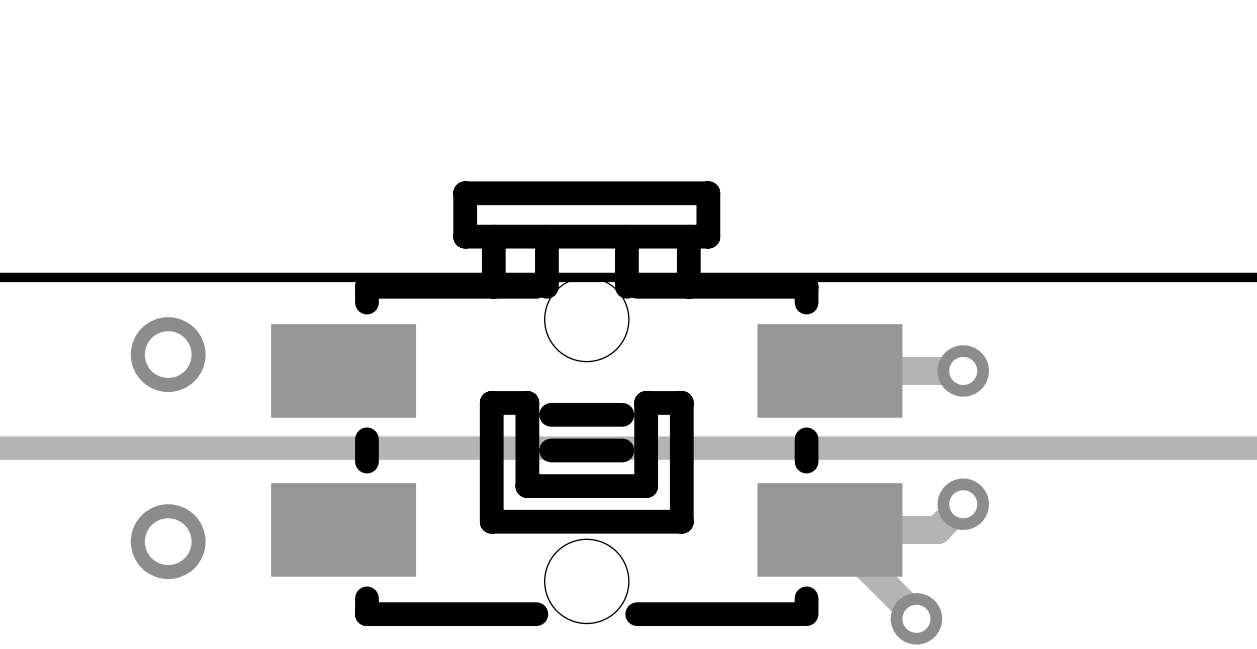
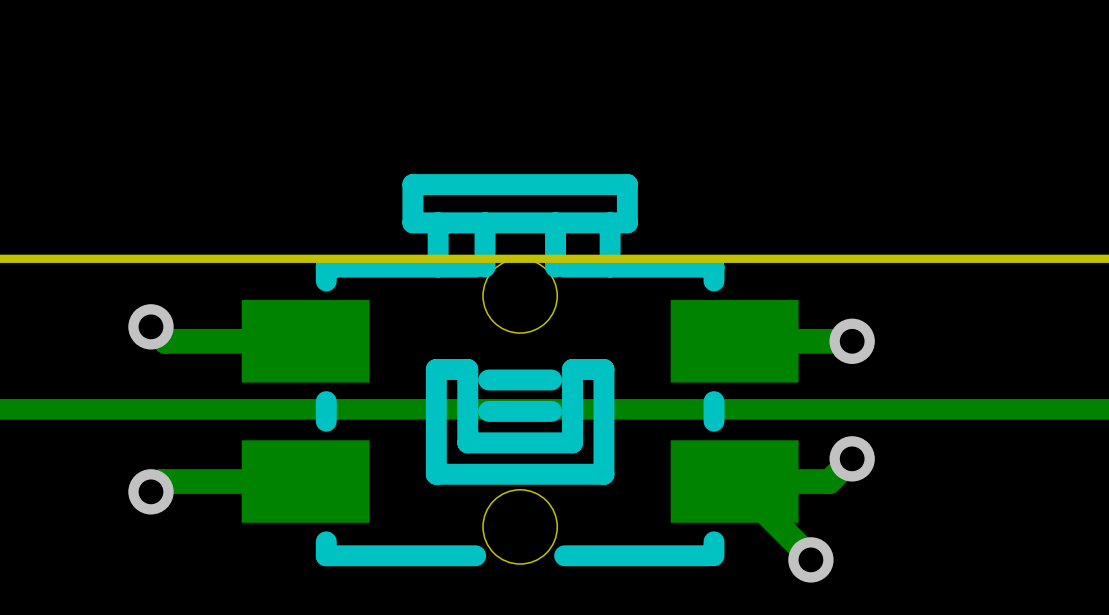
via size: [130, 317, 206, 393] -> [128, 304, 174, 350]
track: none -> (150, 326) (165, 341) (305, 341)
via size: [130, 504, 206, 580] -> [128, 469, 174, 515]
track: none -> (305, 481) (161, 481) (150, 491)

